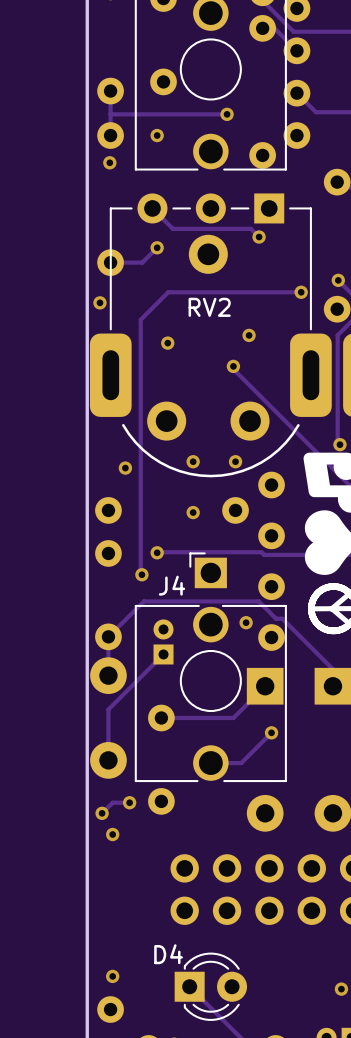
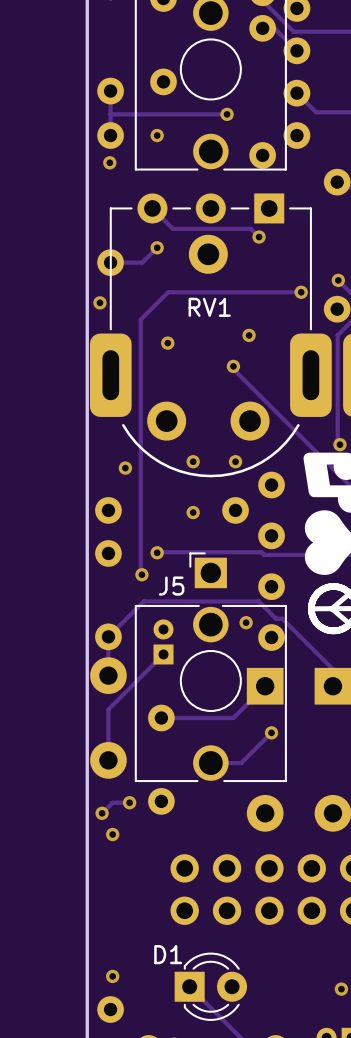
RV2 name: RV2 (209, 307) -> RV1 (209, 307)
J4 name: J4 (171, 585) -> J5 (171, 586)
D4 name: D4 (168, 954) -> D1 (168, 954)

